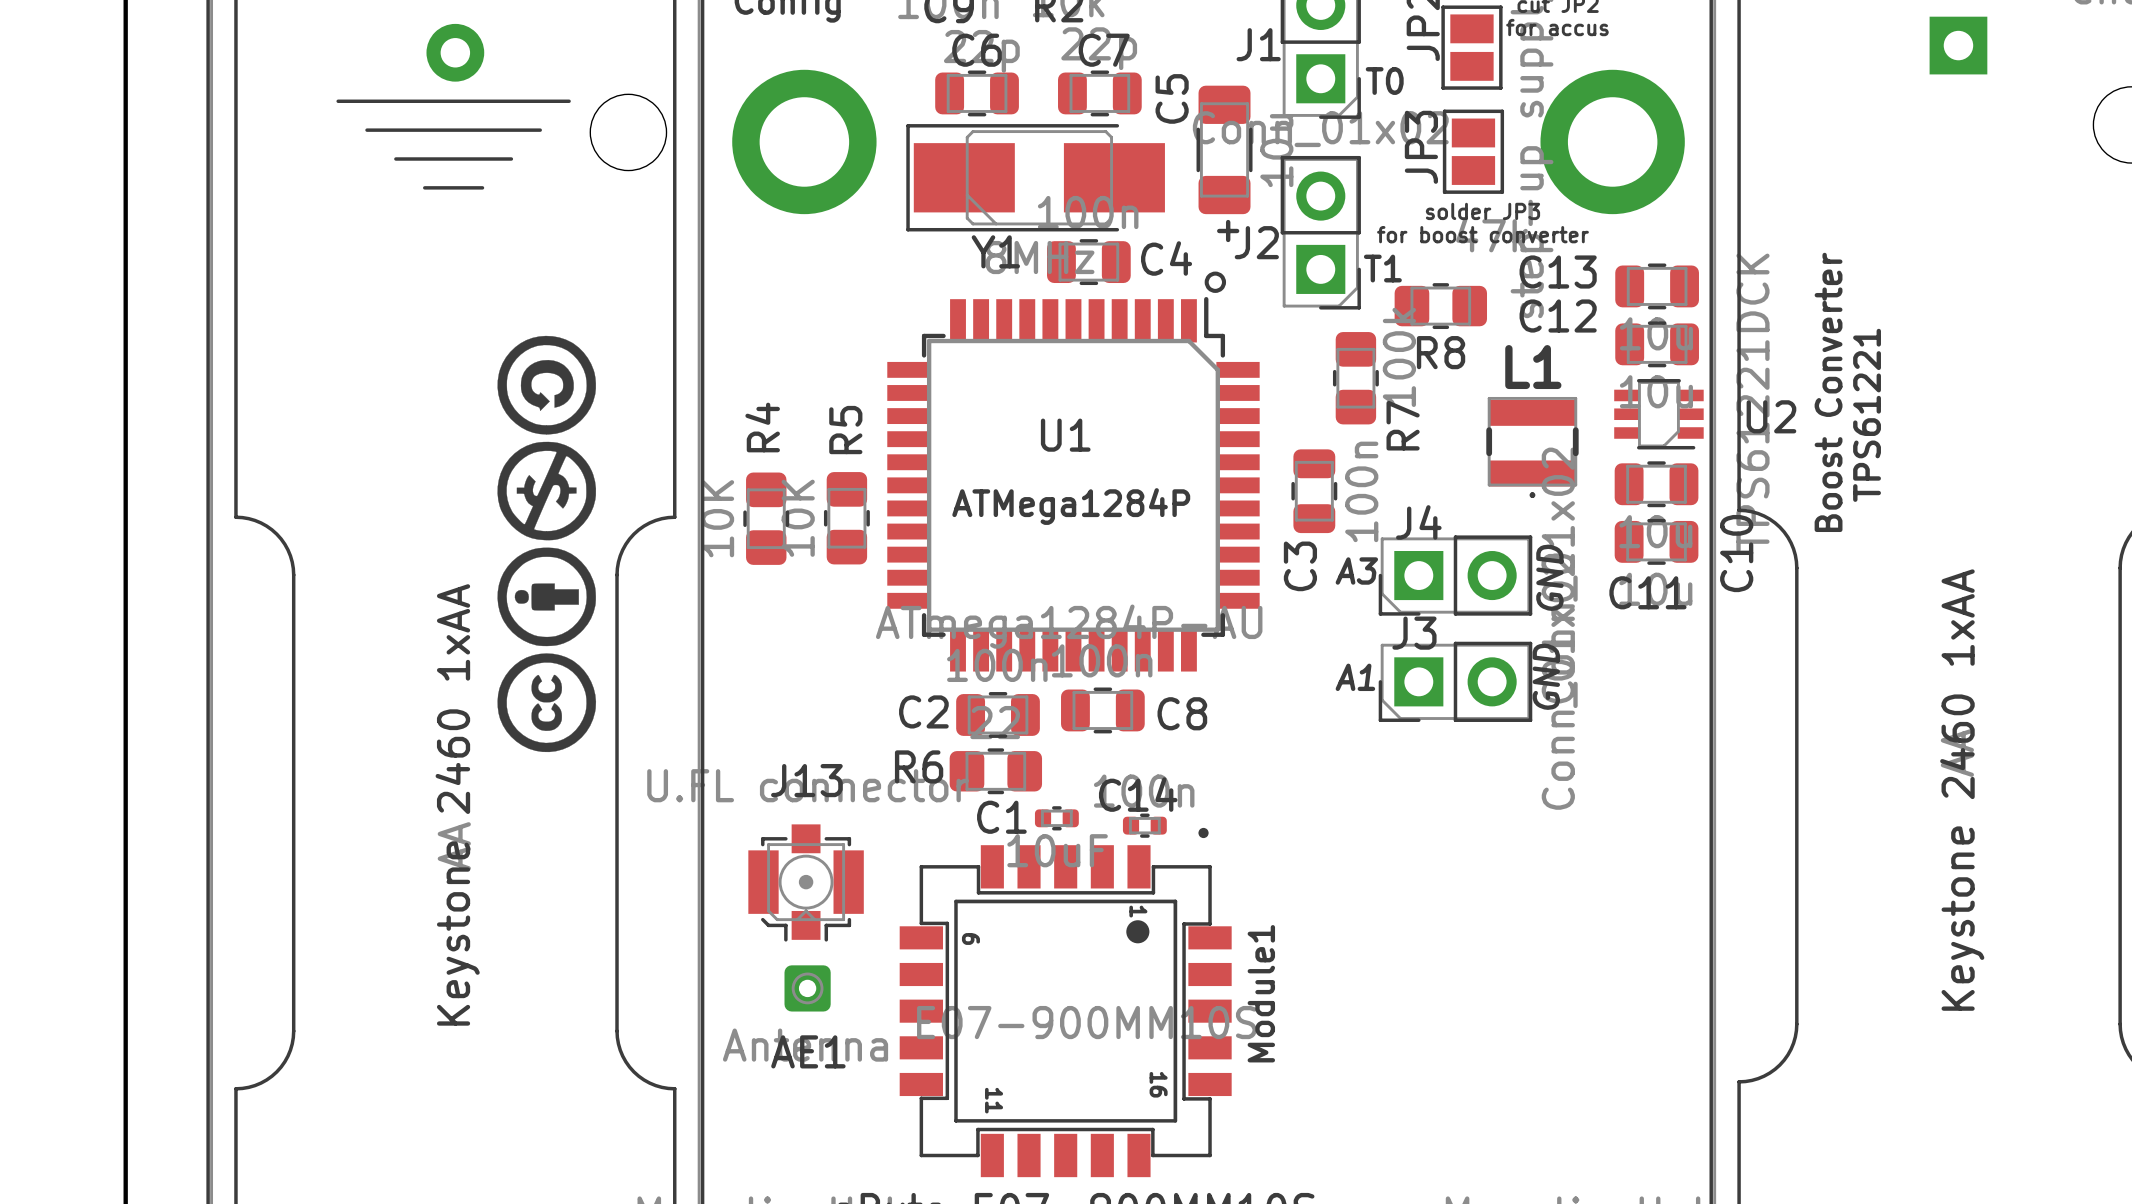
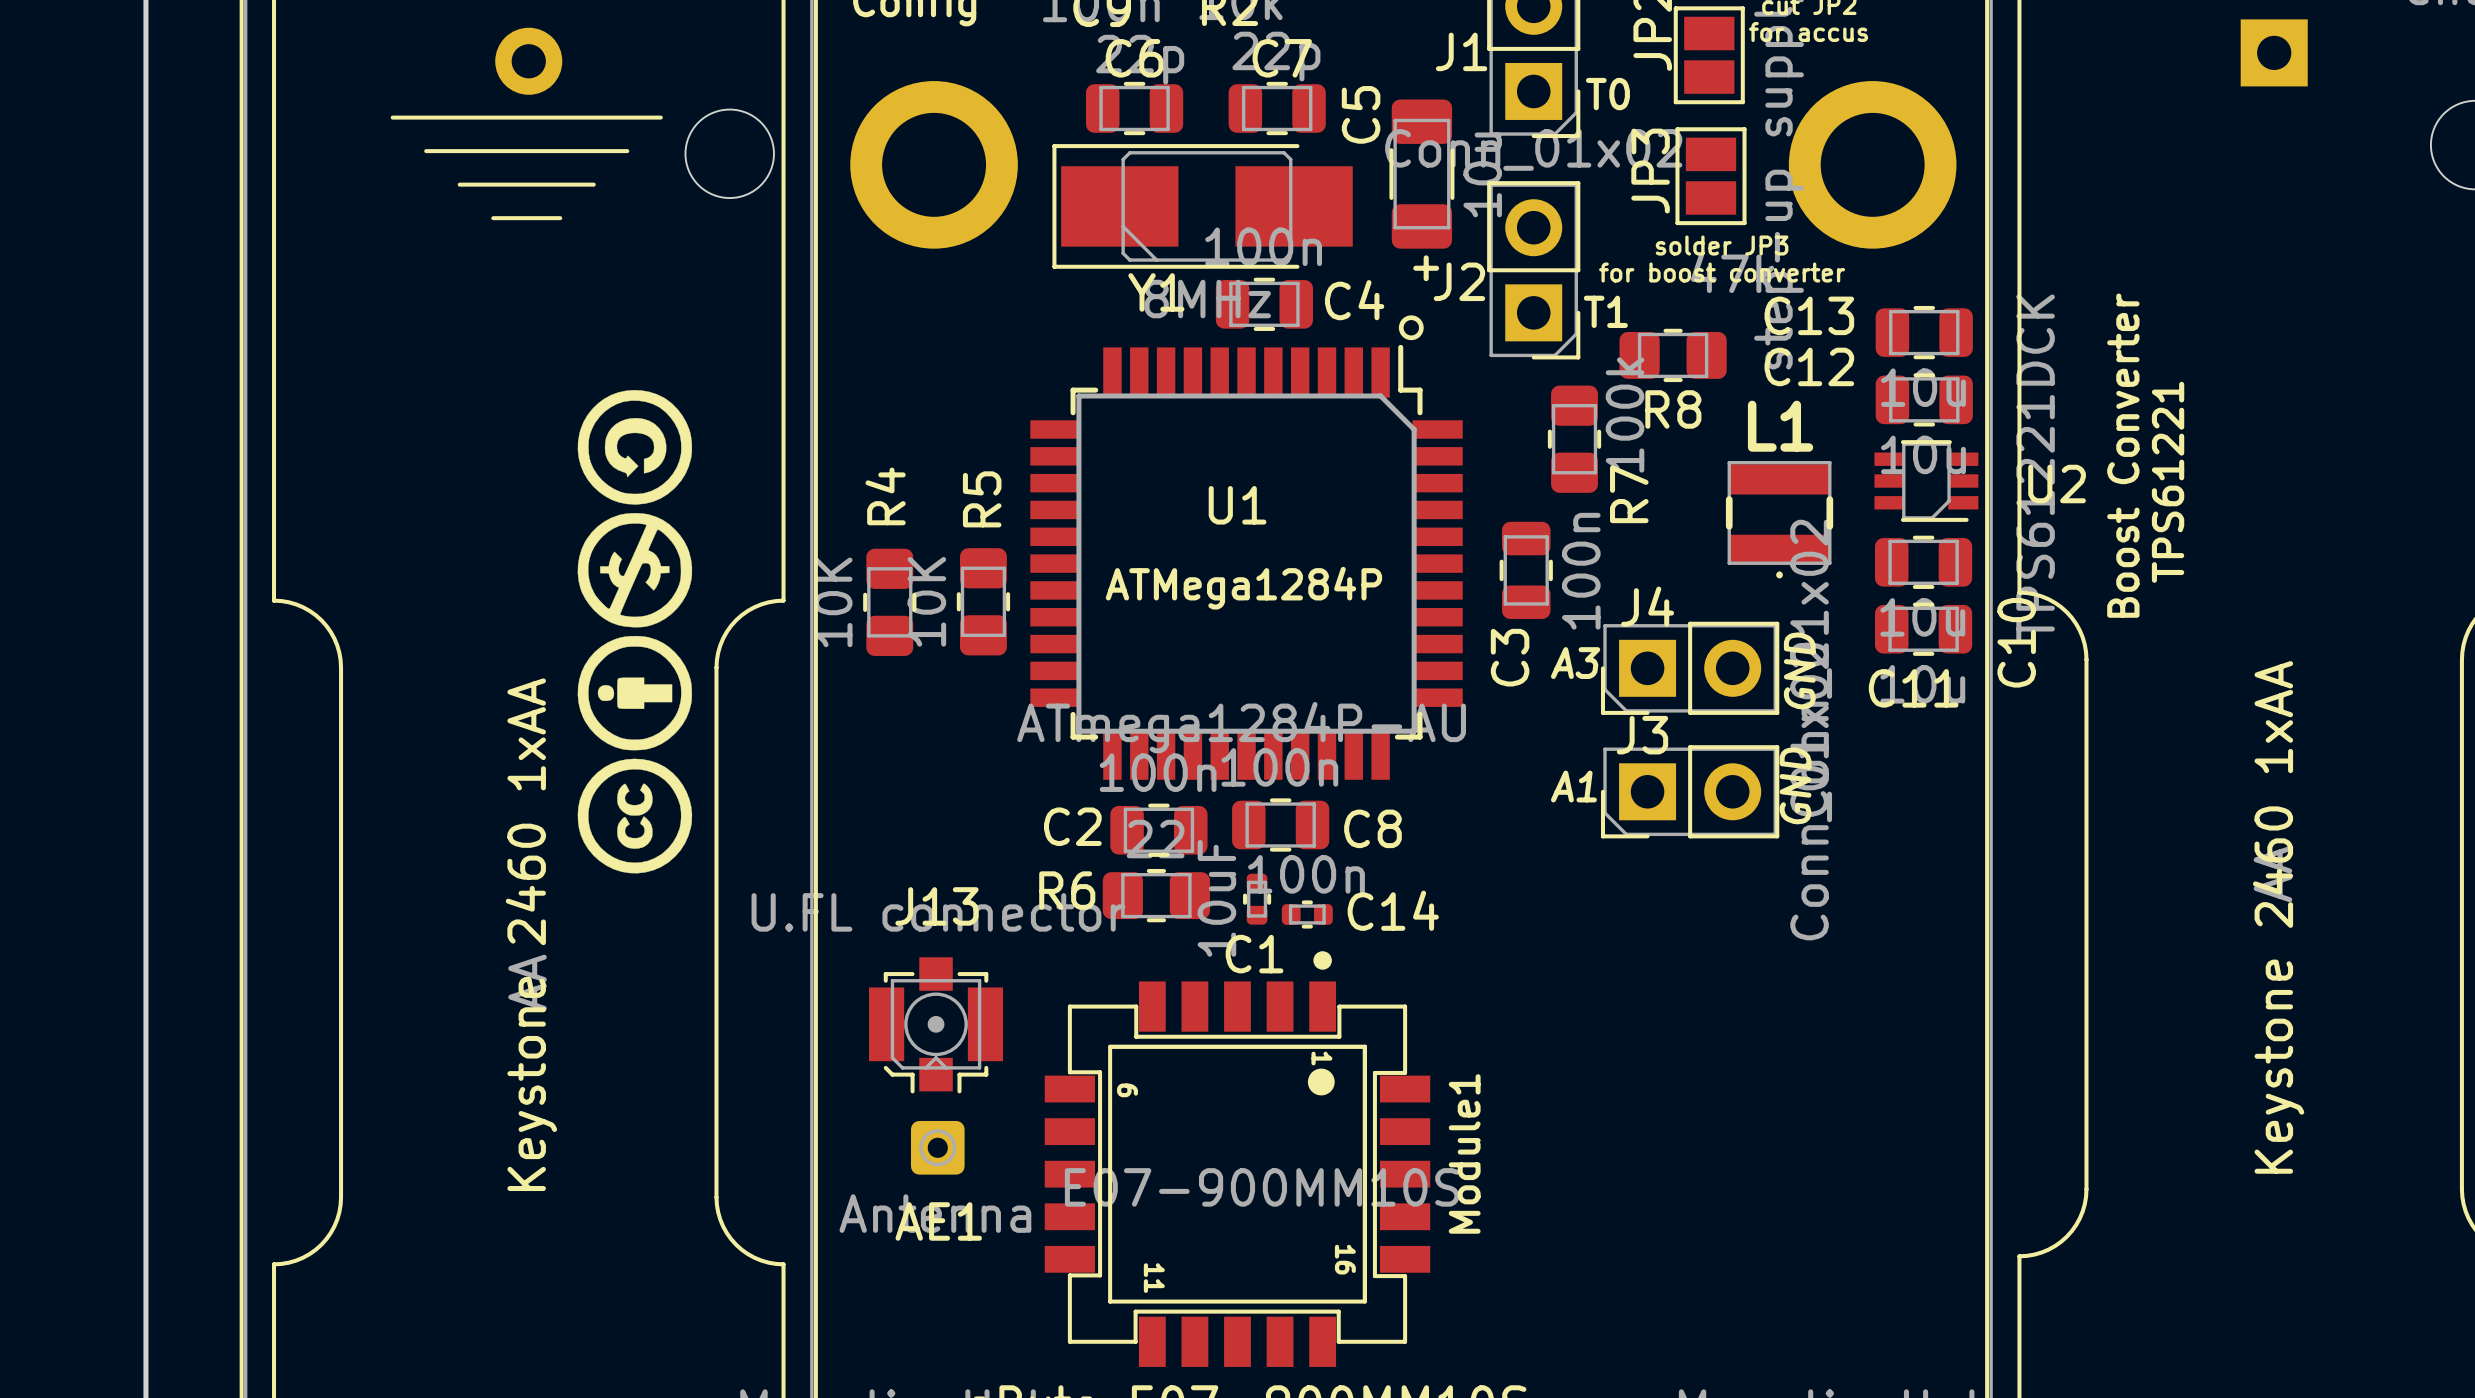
C14 name position: C14 (1138, 794) -> C14 (1393, 910)
C1 name position: C1 (1001, 817) -> C1 (1254, 954)
C1 rotation: 0° (1056, 818) -> 90° clockwise (1257, 899)
C1 position: (1056, 818) -> (1257, 899)
drawing: none -> [1313, 951, 1332, 970]
C14 position: (1144, 825) -> (1307, 914)
drawing: [1198, 827, 1209, 839] -> none

